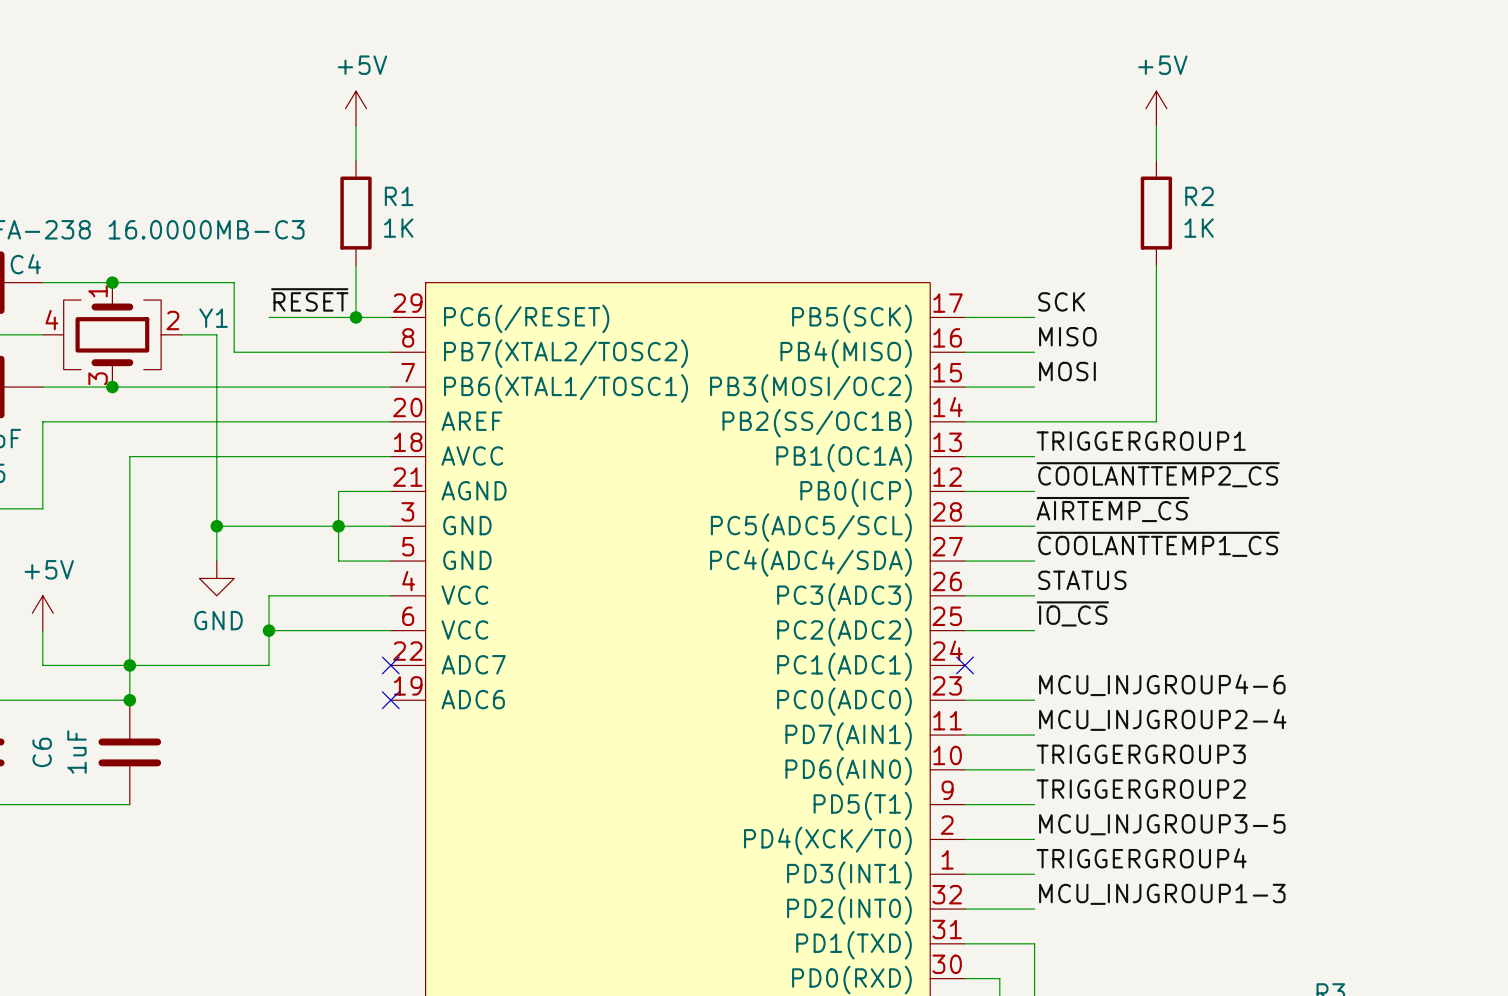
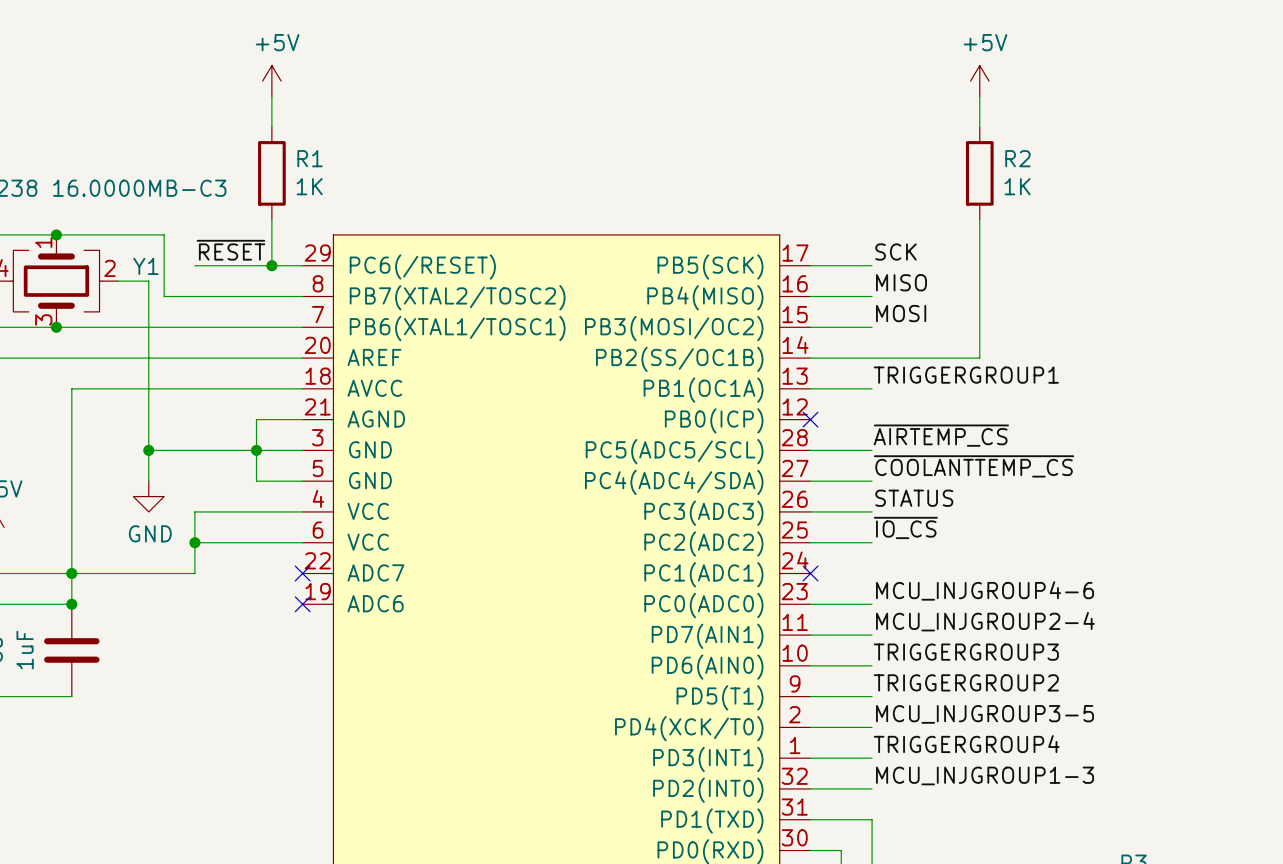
label: ~{COOLANTTEMP2_CS} (1158, 474) -> none
wire: (964, 491) (1034, 491) -> none
no-connect mark: none -> (810, 419)
label: ~{COOLANTTEMP1_CS} (1158, 544) -> ~{COOLANTTEMP_CS} (974, 466)

